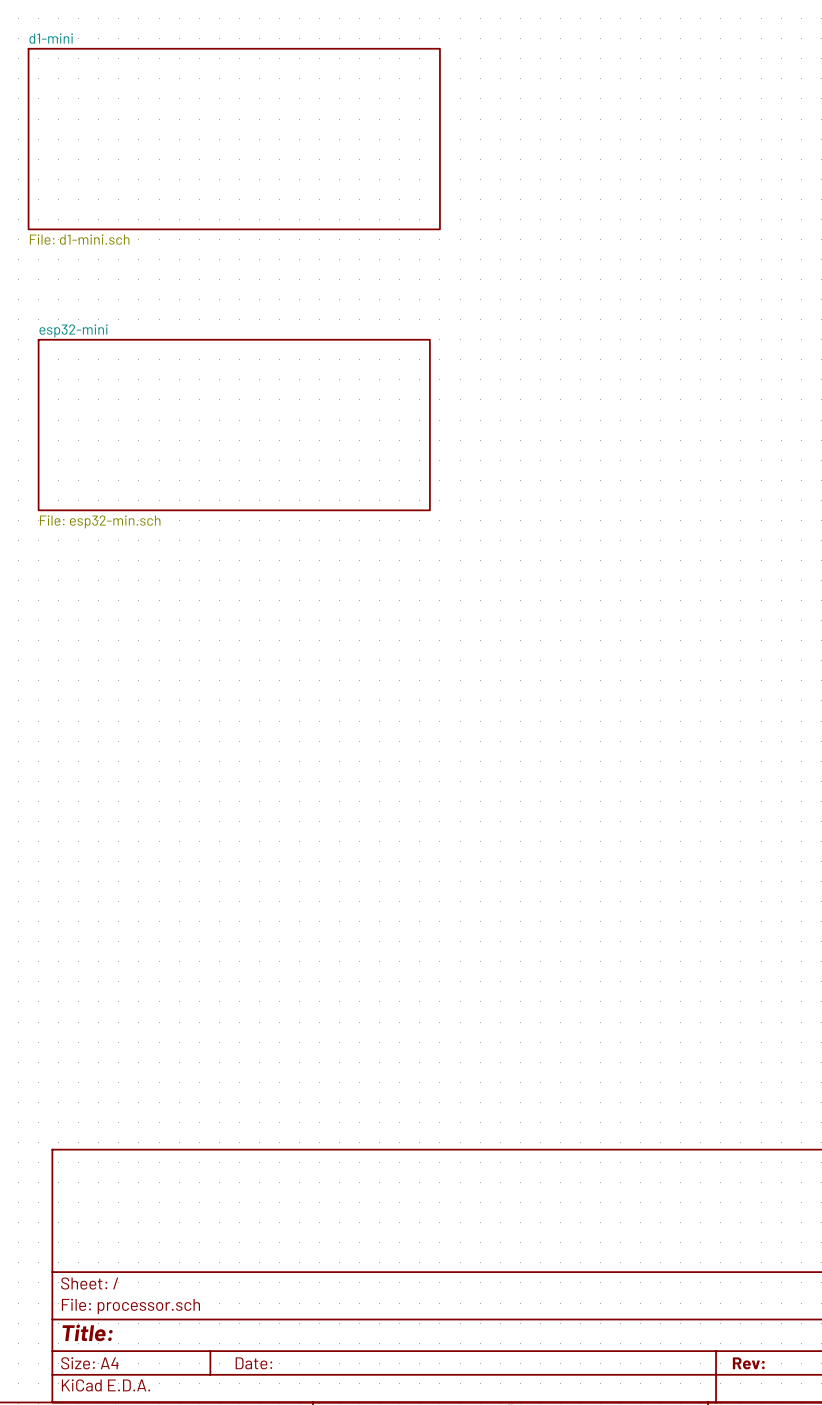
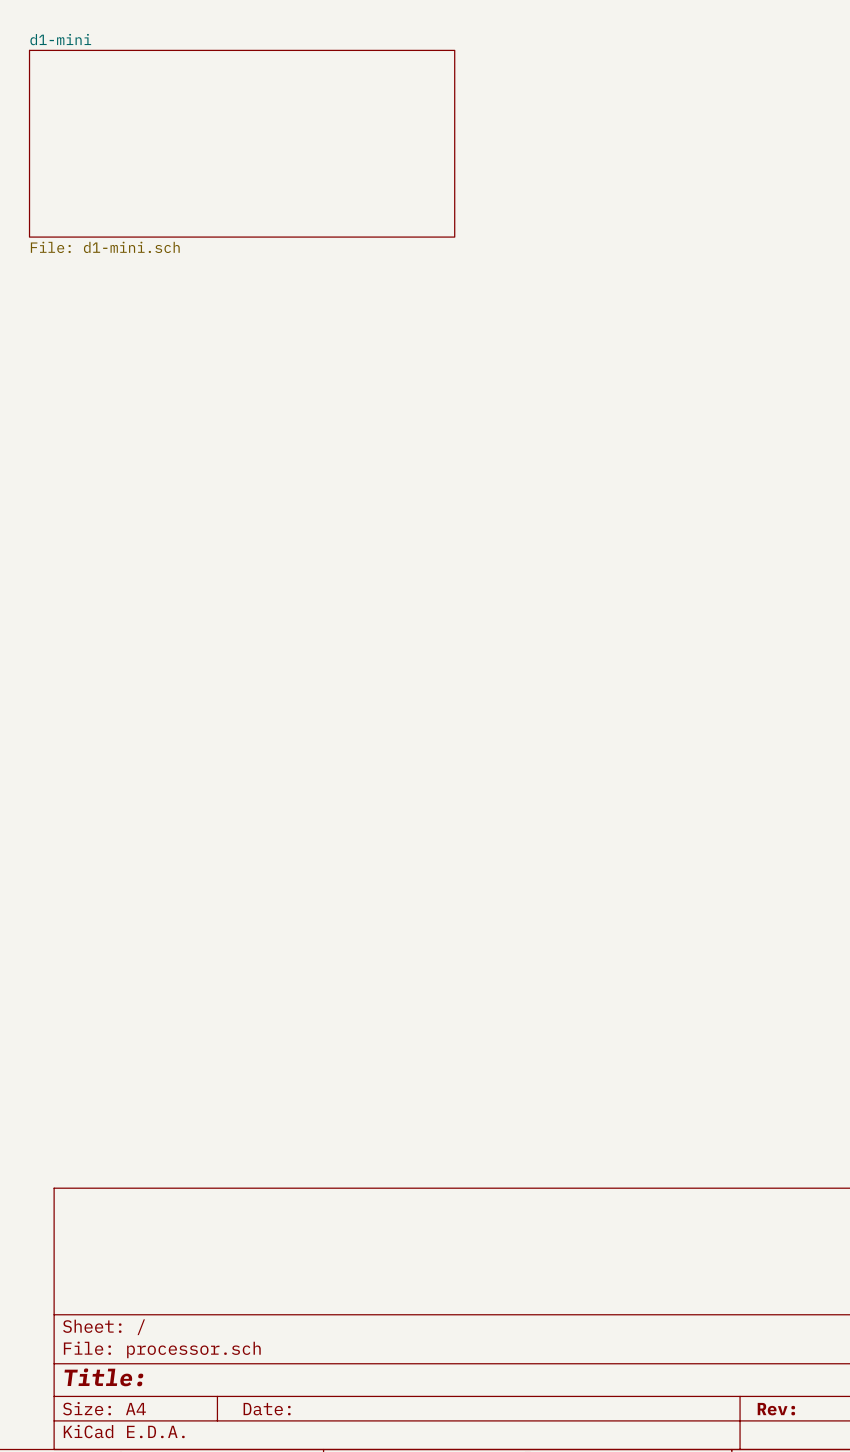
sheet esp32-mini: File: esp32-min.sch (234, 425) -> none

